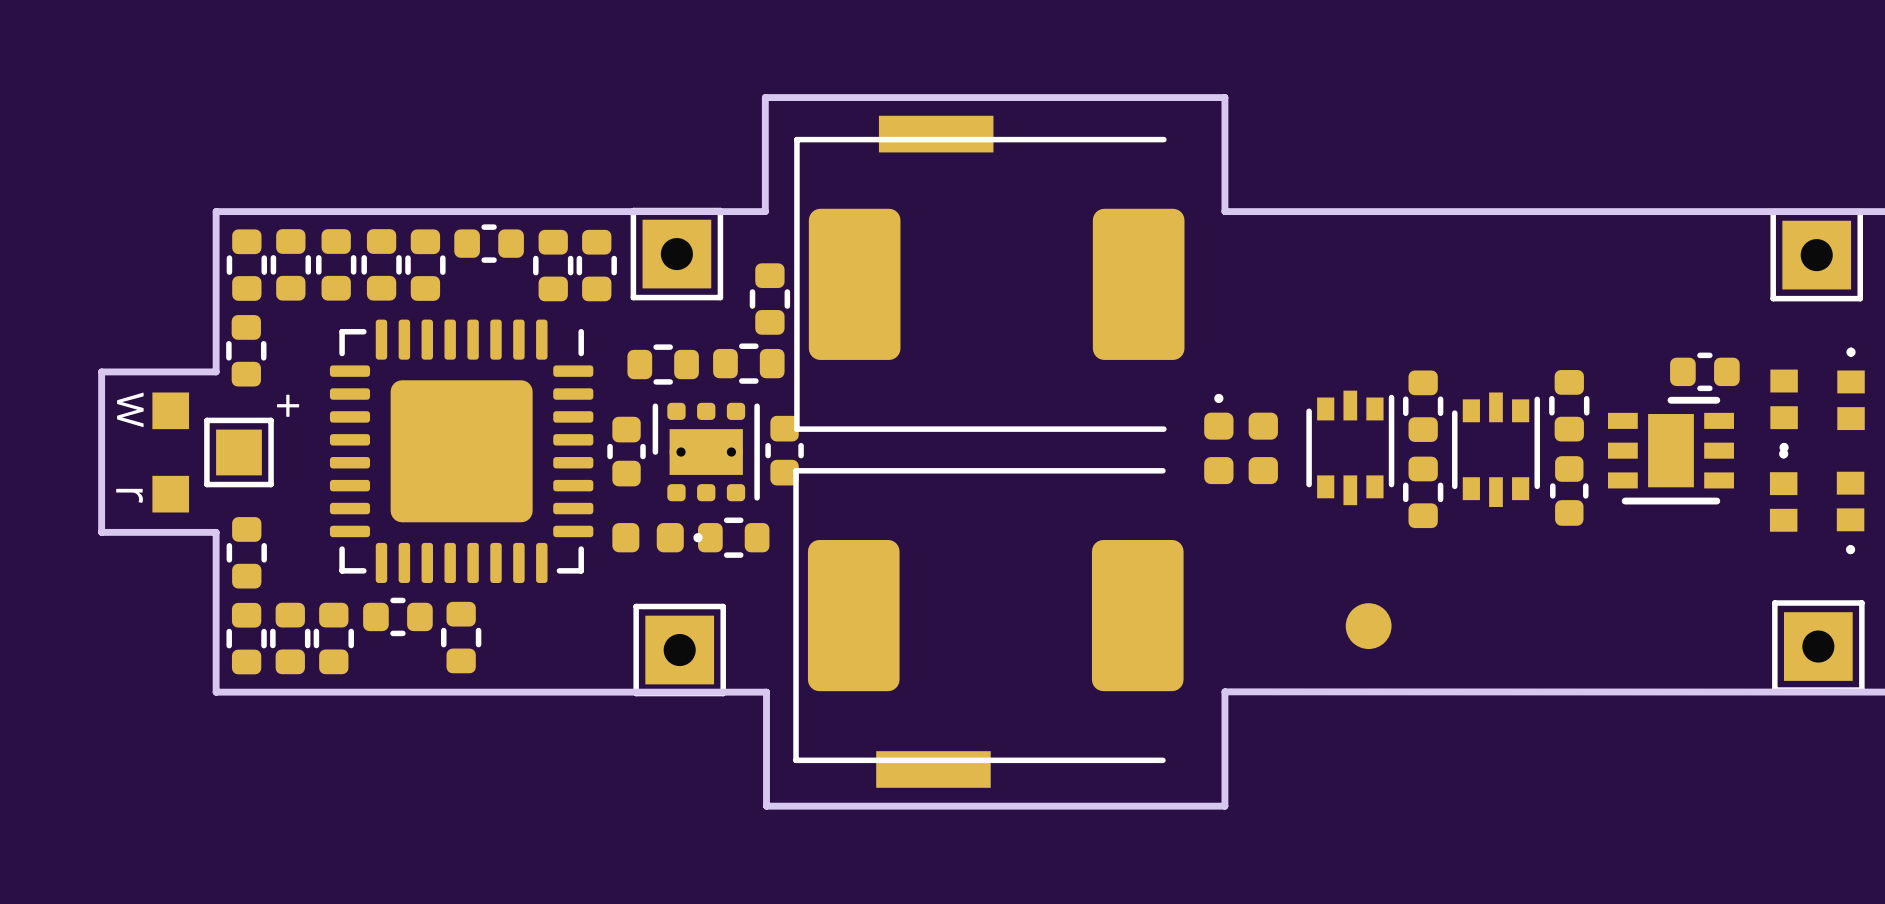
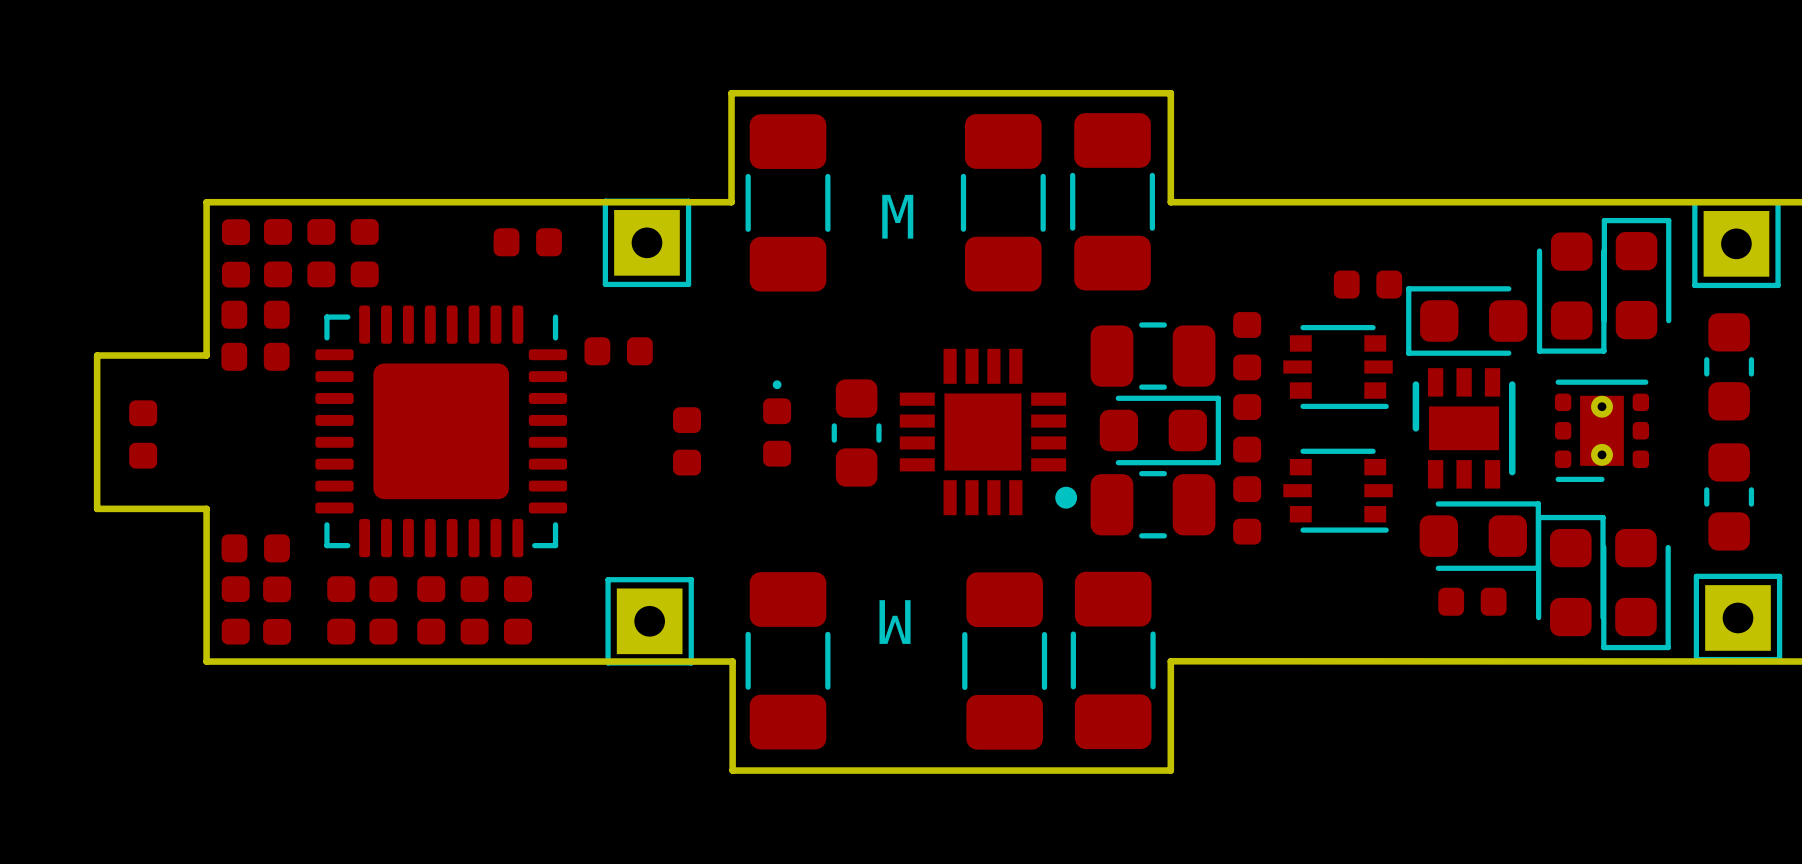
part: (936, 134) -> none
part: none -> (1112, 201)
part: none -> (788, 202)
part: none -> (1003, 202)
text: none -> M (897, 216)
part footprint: [226, 229, 268, 301] -> [221, 219, 250, 288]
part footprint: [270, 229, 311, 301] -> [263, 219, 292, 288]
part footprint: [316, 229, 357, 301] -> [307, 219, 336, 288]
part footprint: [361, 229, 402, 301] -> [350, 219, 379, 288]
part footprint: [533, 229, 574, 302] -> [493, 228, 562, 257]
part: (489, 243) -> none
part: (425, 265) -> none
part: (596, 265) -> none
part: (989, 284) -> none
part: none -> (1636, 278)
part: none -> (1367, 284)
part: (769, 299) -> none
part: none -> (1571, 293)
part: none -> (255, 314)
part: none -> (1466, 321)
part footprint: [627, 344, 699, 385] -> [584, 337, 653, 366]
part: (246, 350) -> none
part: none -> (1247, 346)
part: (748, 363) -> none
part footprint: [1403, 370, 1444, 442] -> [1283, 324, 1393, 410]
part: (1704, 371) -> none
part: none -> (1153, 356)
part: none -> (255, 356)
part: none -> (1729, 366)
part: (1851, 388) -> none
part footprint: [1204, 393, 1234, 485] -> [1099, 395, 1222, 466]
part footprint: [1608, 396, 1734, 505] -> [1554, 379, 1650, 483]
part footprint: [652, 402, 760, 502] -> [673, 407, 702, 476]
text: + (288, 405) -> none
part: (1569, 405) -> none
text: w (130, 409) -> none
part: (170, 410) -> none
part: (1784, 410) -> none
part footprint: [765, 415, 804, 486] -> [763, 380, 792, 467]
part: (1350, 447) -> none
part position: (1263, 448) -> (1247, 428)
part: none -> (1464, 428)
part: (1495, 449) -> none
part: (626, 451) -> none
part: none -> (988, 432)
part: (238, 452) -> none
part: none -> (856, 433)
part: none -> (143, 434)
part footprint: [1403, 456, 1444, 529] -> [1283, 448, 1393, 533]
part: (1569, 490) -> none
part: (1783, 490) -> none
part: (170, 494) -> none
text: r (129, 495) -> none
part: (1850, 512) -> none
part footprint: [226, 517, 267, 589] -> [221, 534, 290, 563]
part: none -> (1729, 496)
part: none -> (1153, 504)
part: none -> (1247, 510)
part: (657, 537) -> none
part: (733, 537) -> none
part: none -> (1480, 536)
part footprint: [363, 597, 433, 637] -> [369, 576, 398, 645]
part footprint: [441, 601, 482, 674] -> [417, 576, 446, 645]
part footprint: [226, 602, 267, 675] -> [221, 576, 250, 645]
part footprint: [270, 602, 311, 675] -> [263, 576, 292, 645]
part: none -> (1570, 575)
part: (988, 615) -> none
part: none -> (1635, 589)
part: (1368, 626) -> none
part: none -> (1472, 601)
part: (333, 638) -> none
part: none -> (341, 610)
part: none -> (474, 610)
part: none -> (517, 610)
text: none -> M (895, 622)
part: none -> (1113, 660)
part: none -> (788, 660)
part: none -> (1004, 661)
part: (933, 769) -> none

